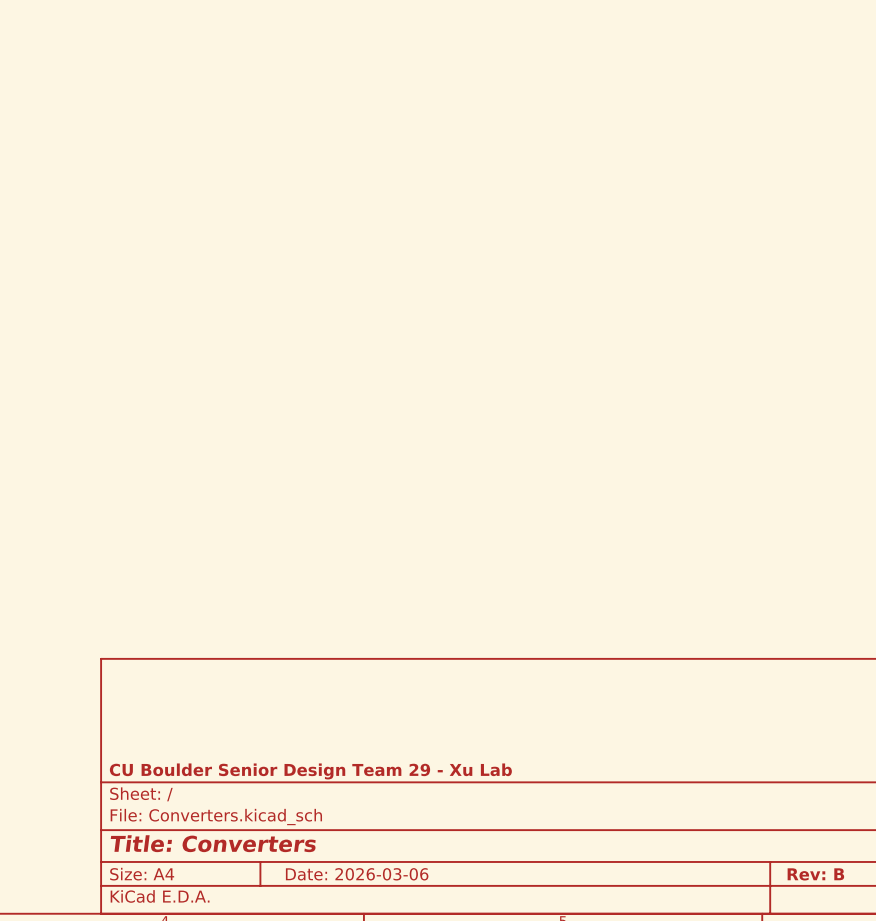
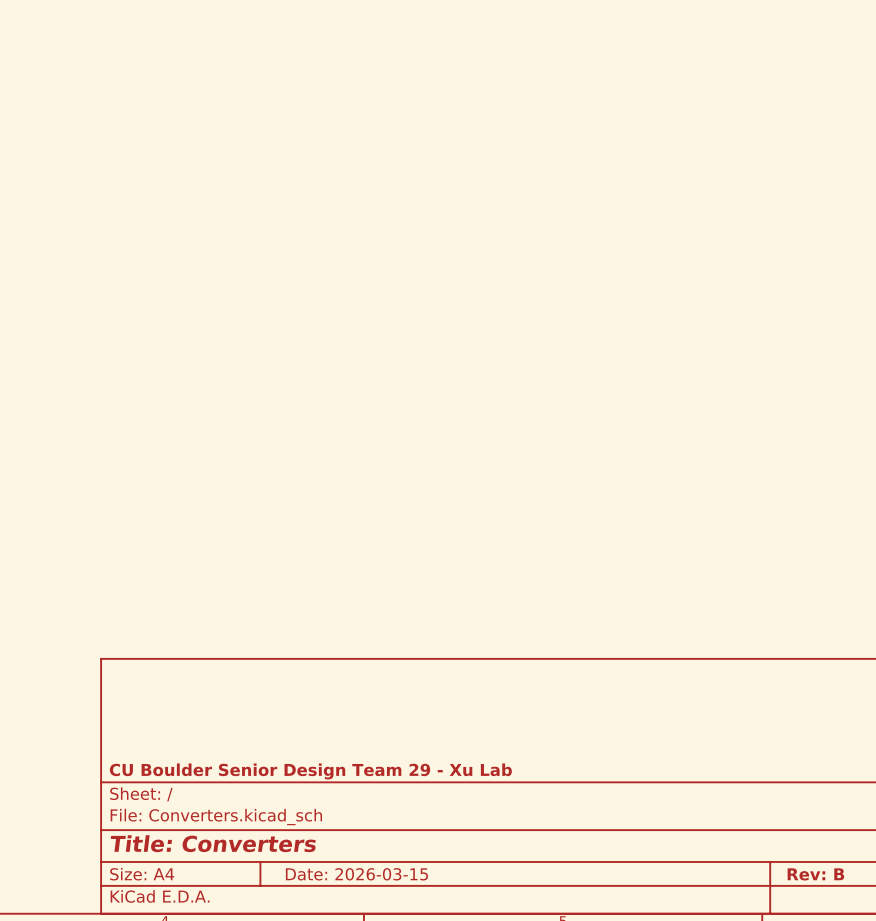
title block: Date: 2026-03-06 (357, 874) -> Date: 2026-03-15 (356, 874)

